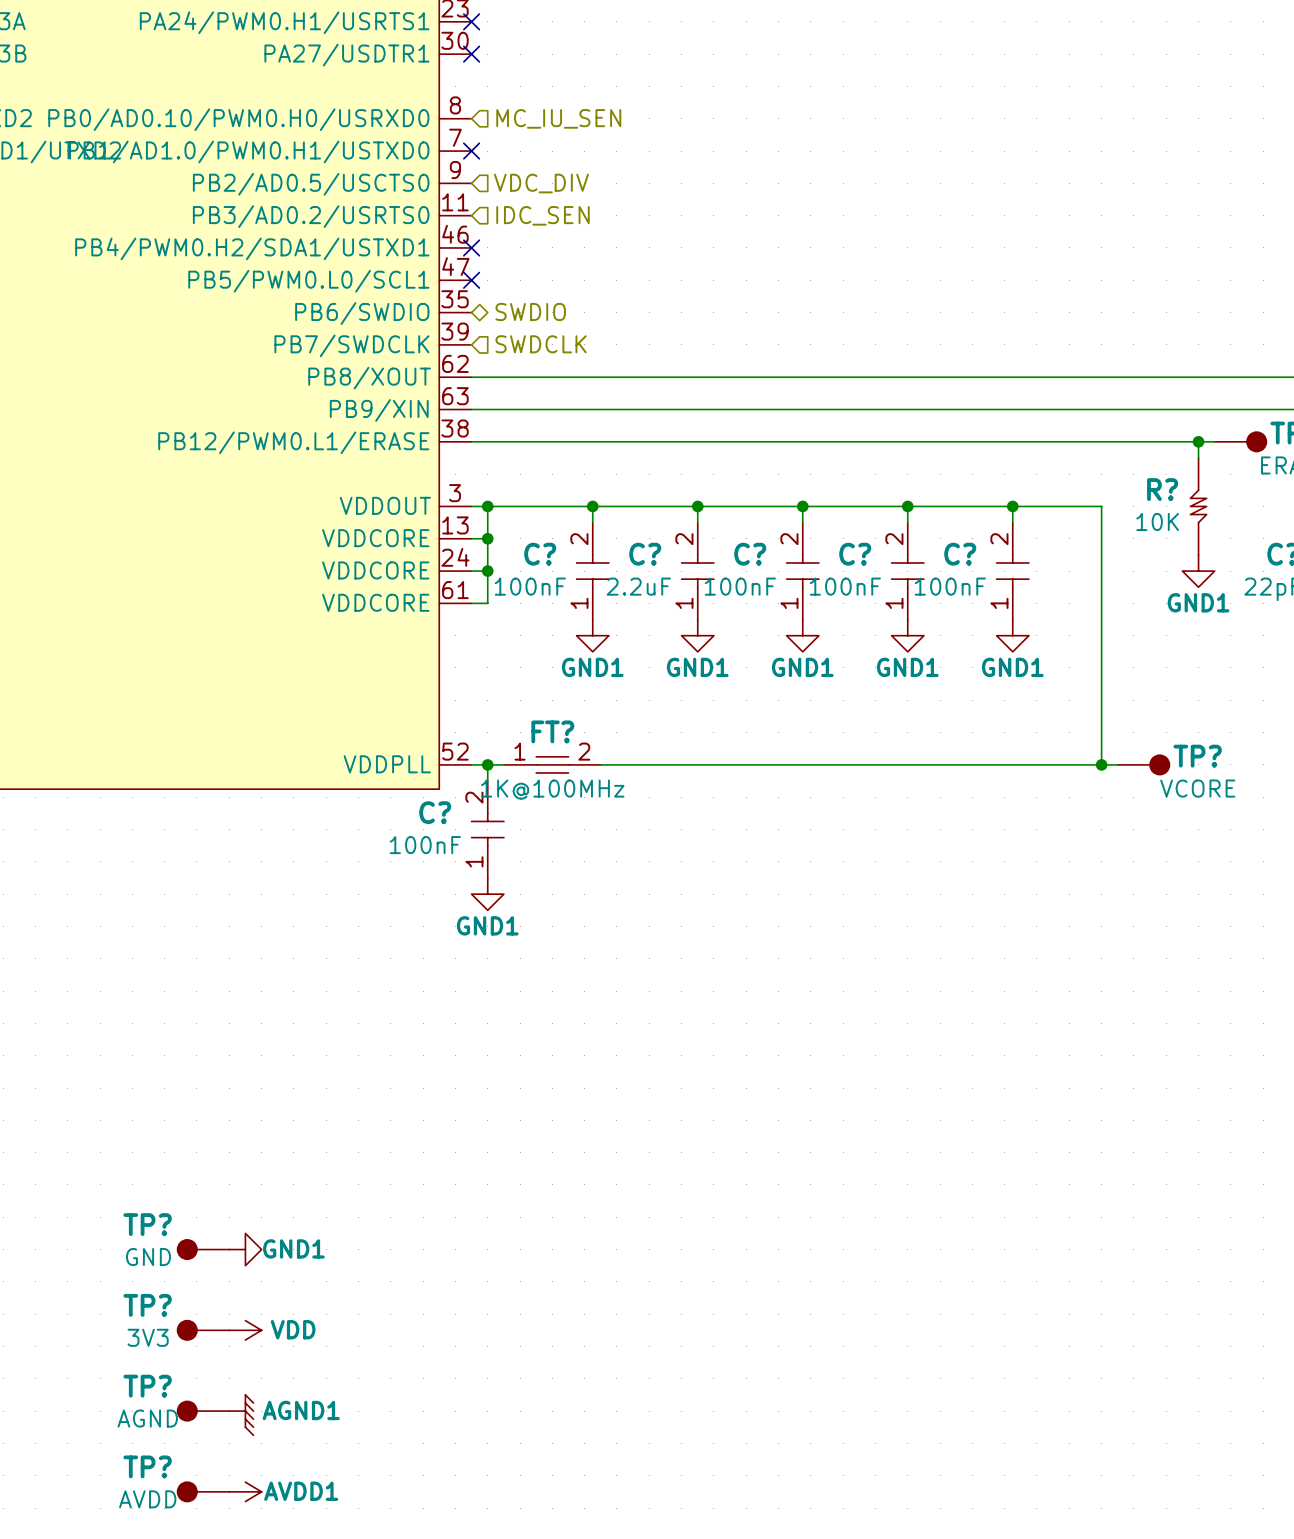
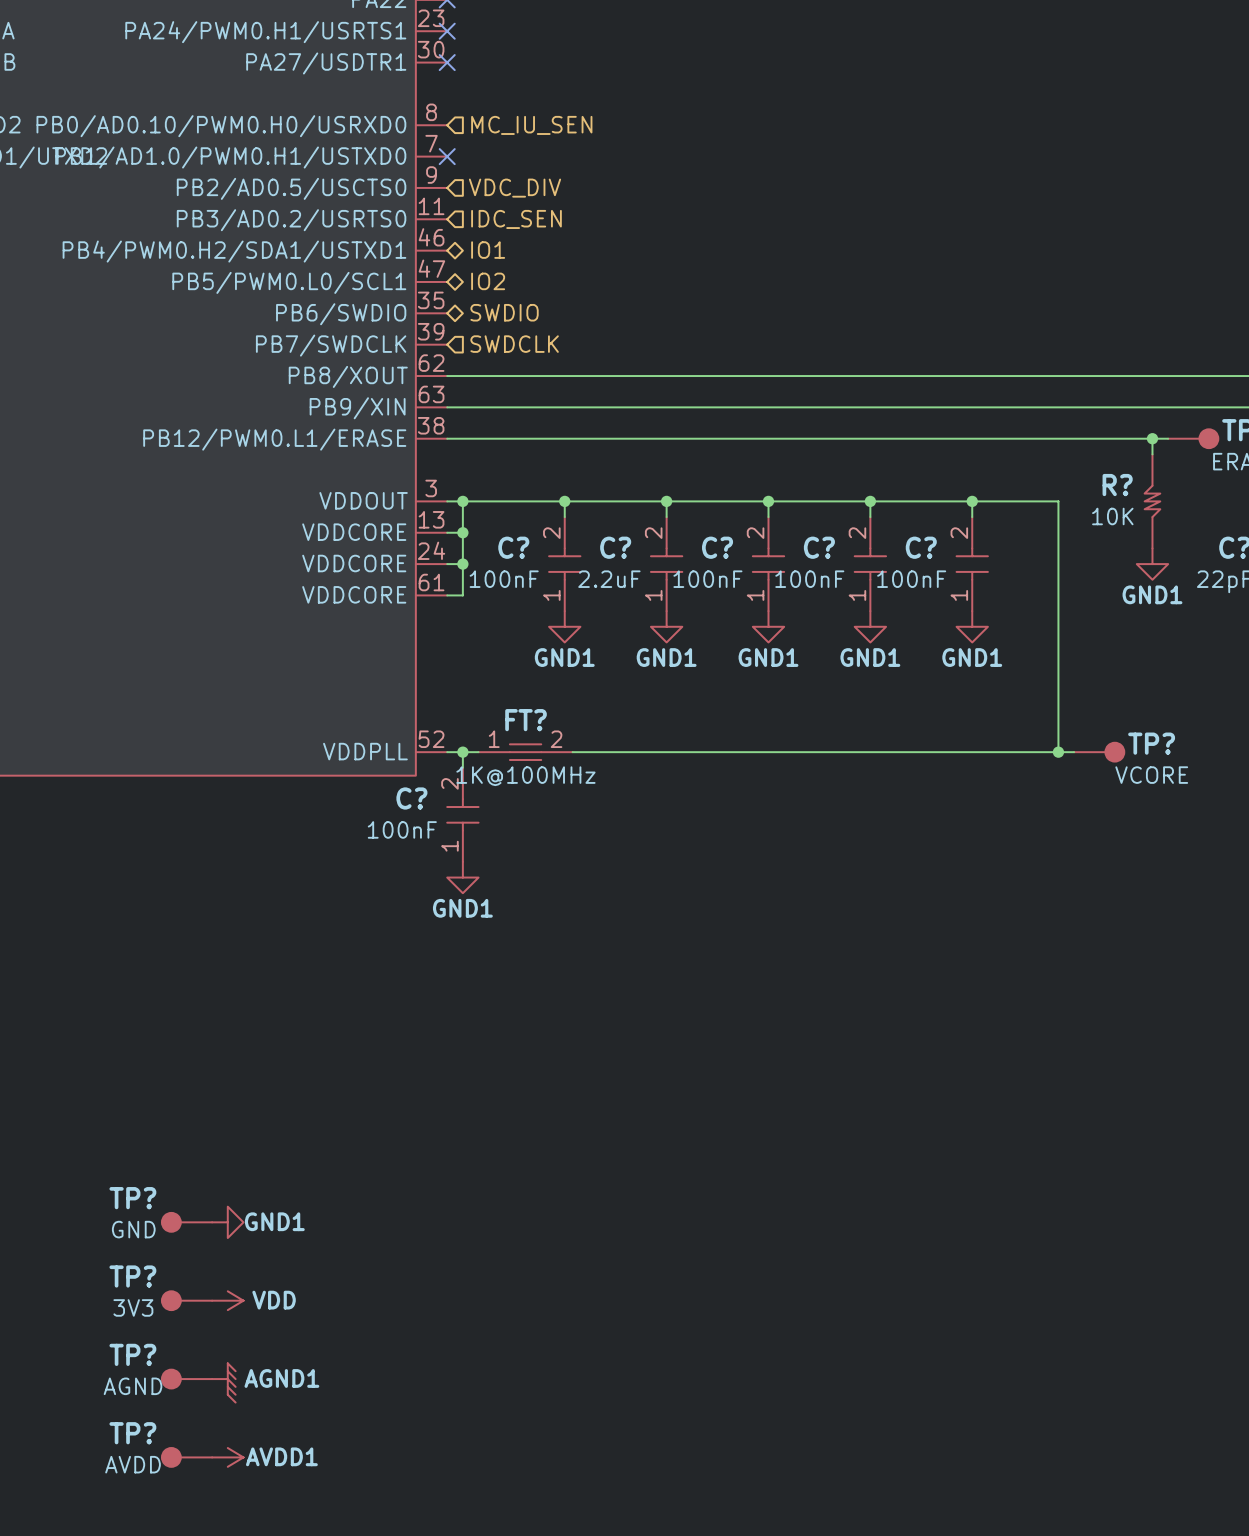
no-connect mark: (471, 247) -> none
hierarchical label: none -> IO1 (488, 250)
hierarchical label: none -> IO2 (488, 281)
no-connect mark: (471, 280) -> none

